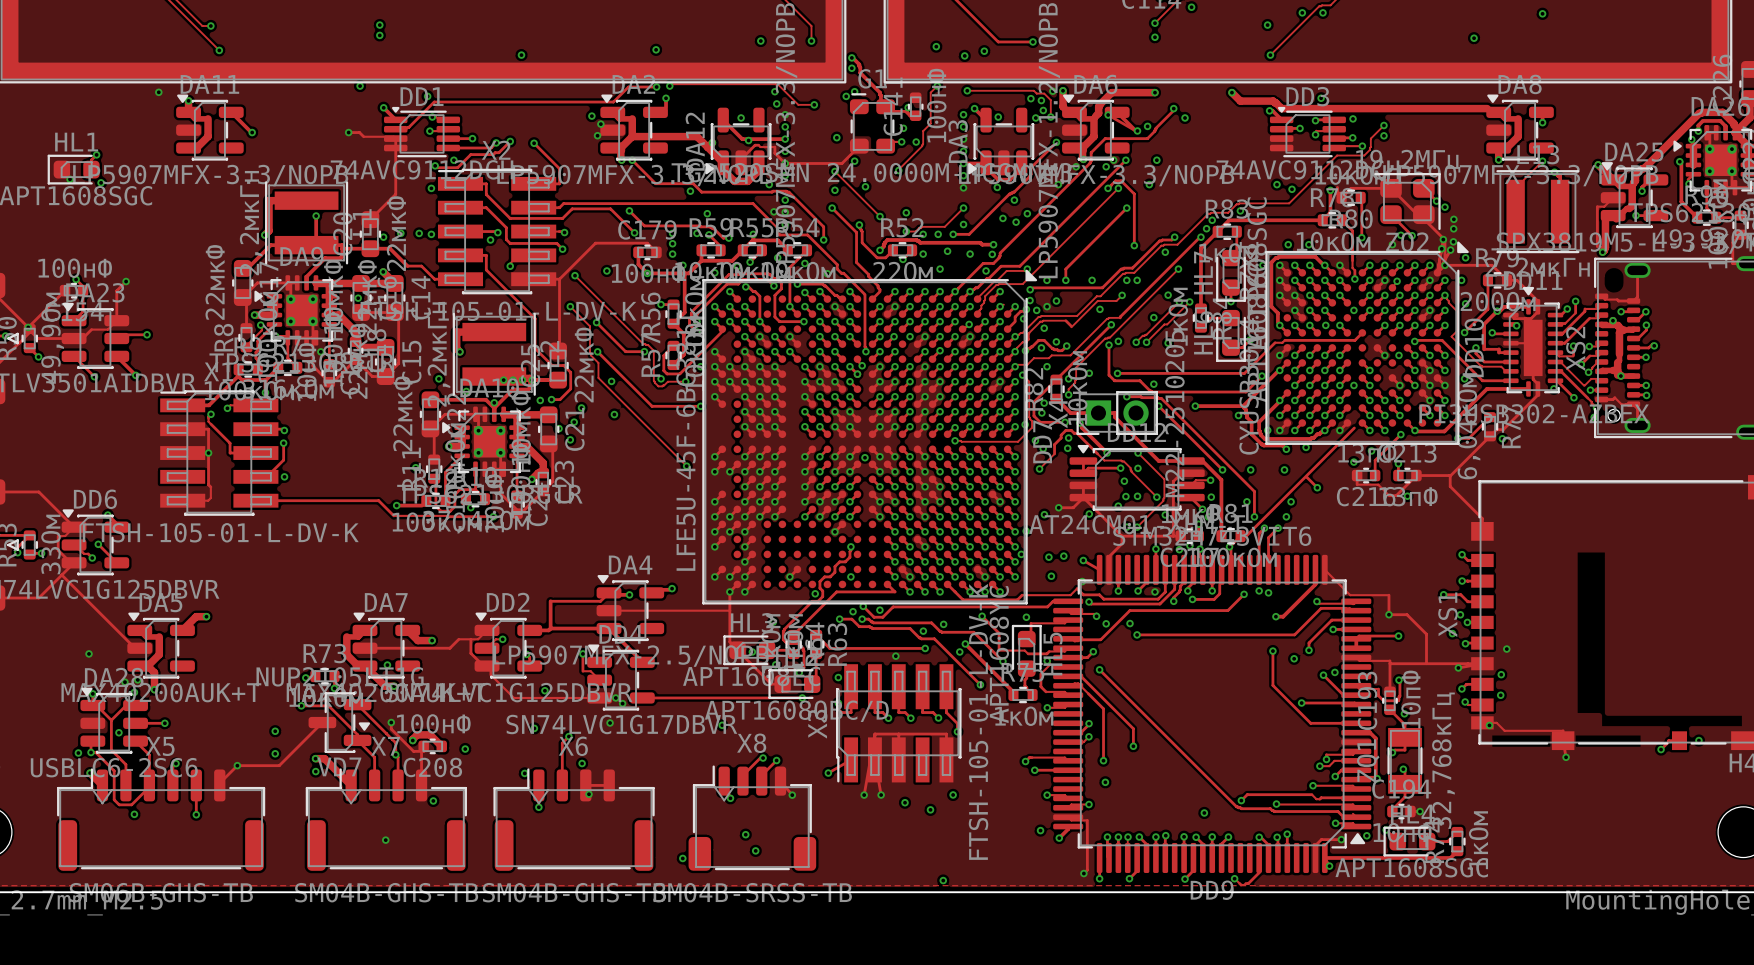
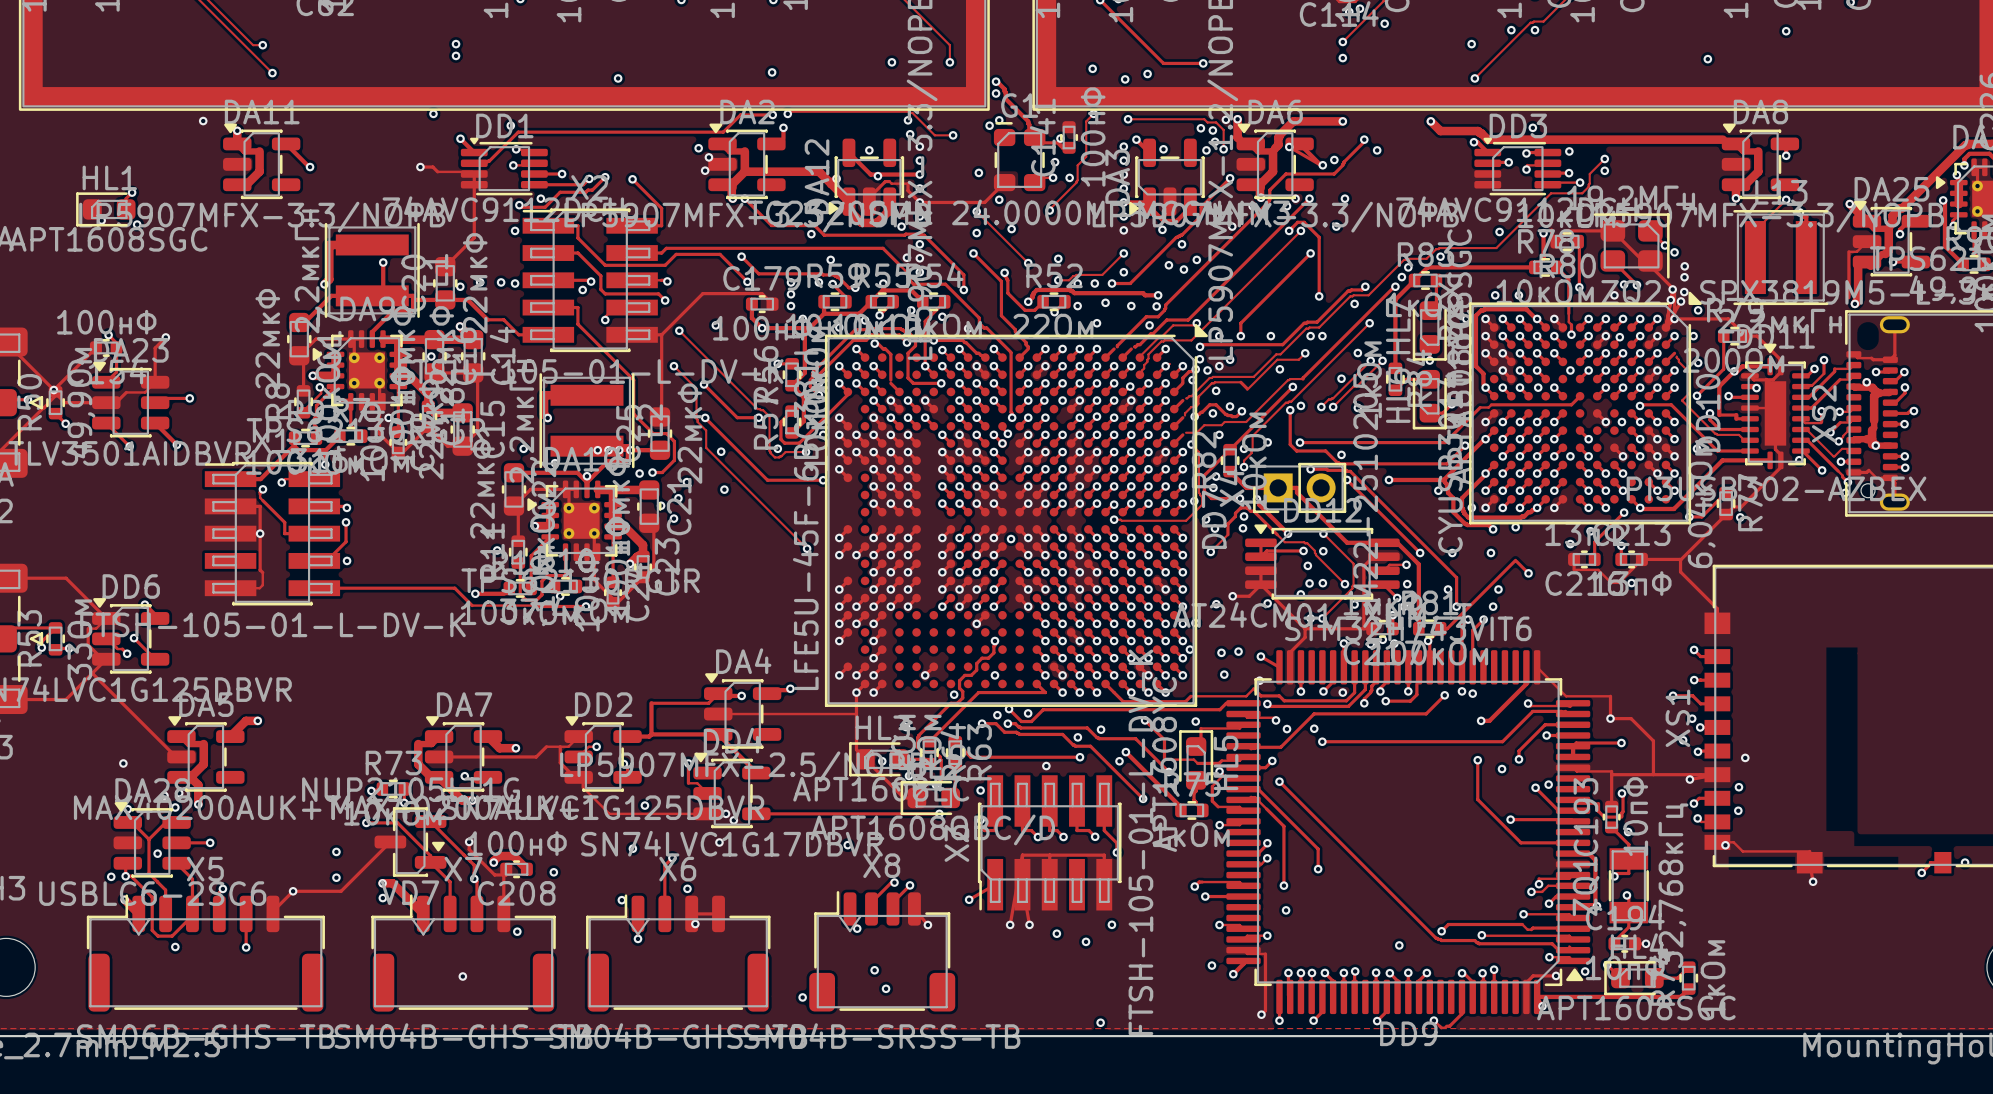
via: (1276, 184) -> none
via: (955, 291) -> none
via: (970, 291) -> none
via: (1444, 295) -> none
via: (759, 321) -> none
via: (1015, 336) -> none
via: (1015, 351) -> none
via: (1015, 366) -> none
track: (1354, 428) (1305, 476) -> none

